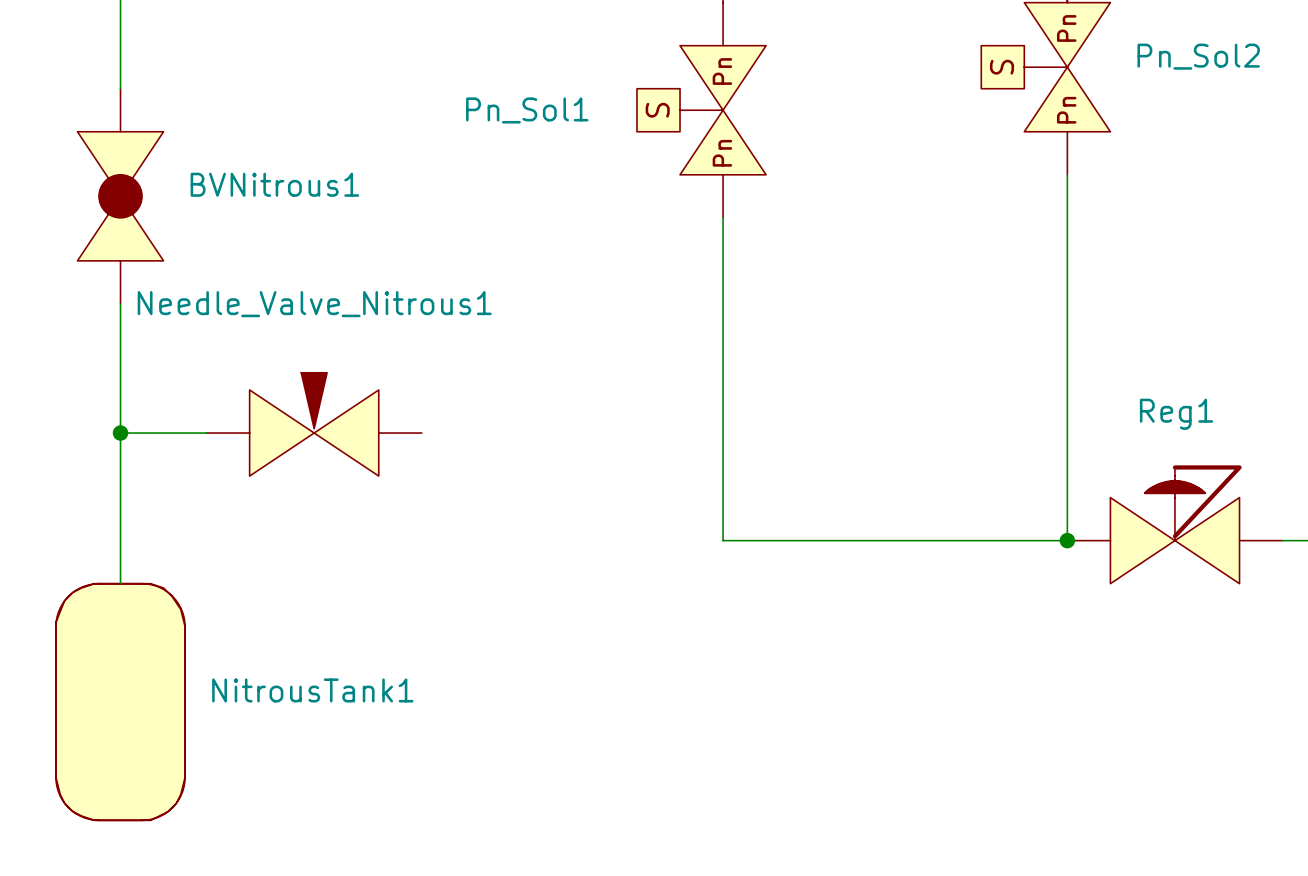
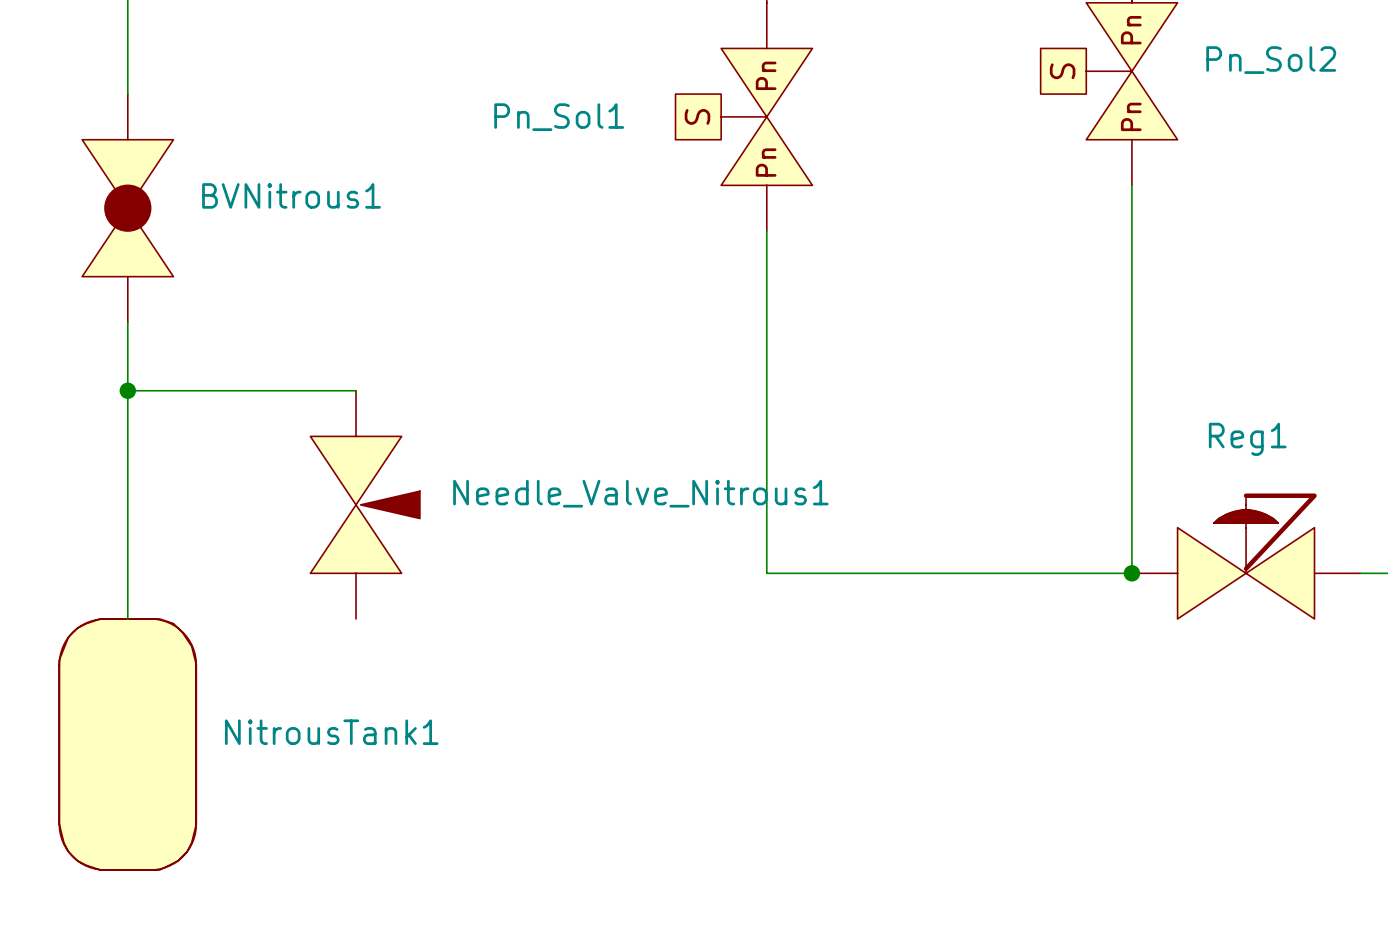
Needle_Valve_Nitrous1 name position: Needle_Valve_Nitrous1 (314, 304) -> Needle_Valve_Nitrous1 (640, 493)
wire: none -> (127, 390) (356, 390)
Needle_Valve_Nitrous1 rotation: 0° (314, 424) -> 90° clockwise (365, 504)
wire: (120, 433) (206, 433) -> none
junction position: (120, 433) -> (127, 390)

